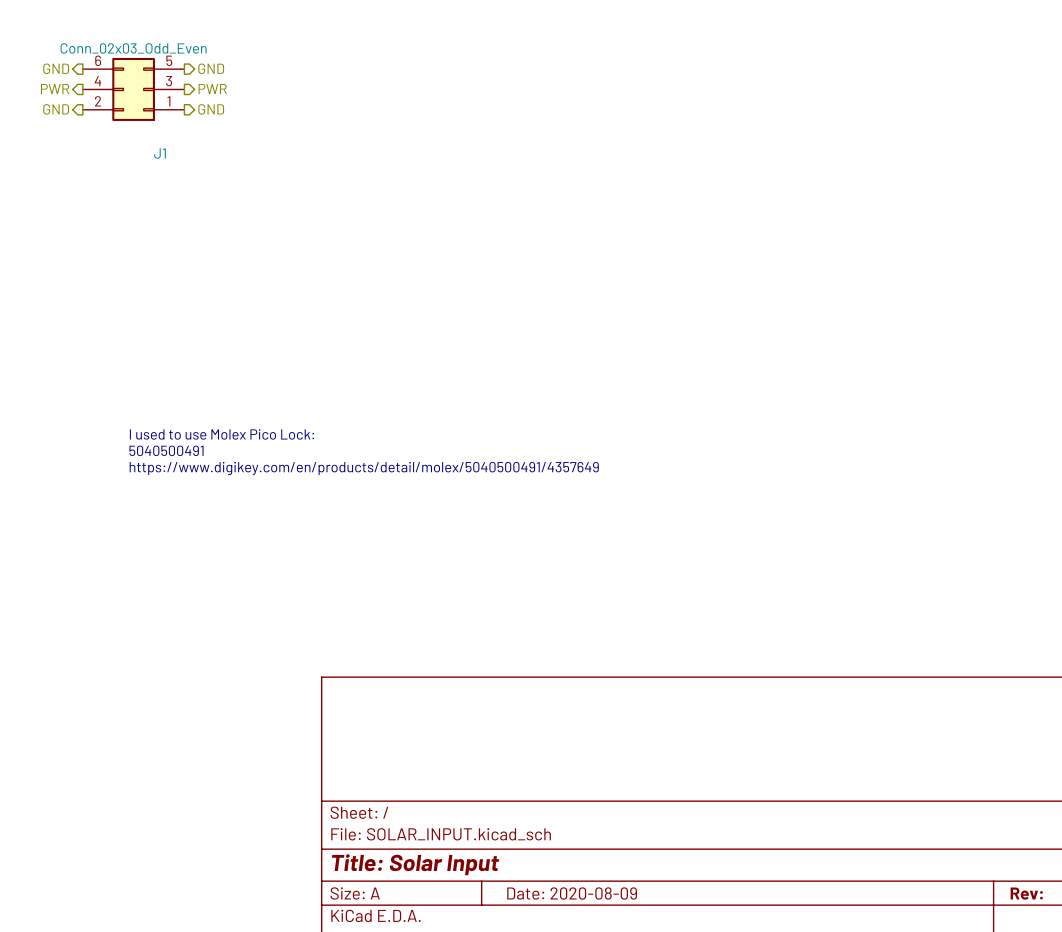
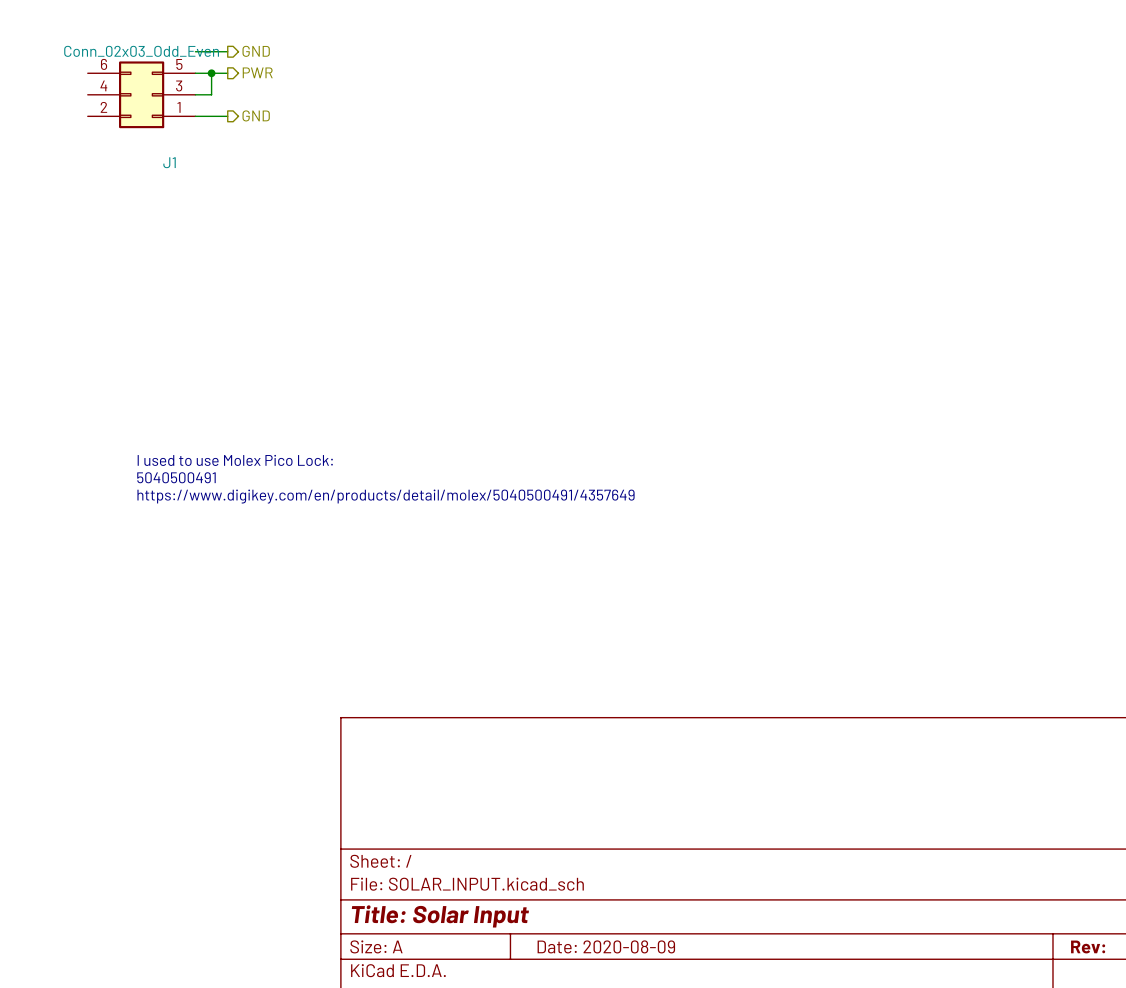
wire: none -> (195, 51) (227, 51)
hierarchical label: GND (56, 68) -> none
hierarchical label position: GND (211, 68) -> GND (256, 51)
wire: none -> (195, 73) (227, 73)
wire: none -> (211, 73) (211, 94) (195, 94)
junction: none -> (211, 73)
hierarchical label: PWR (55, 89) -> none
hierarchical label position: PWR (212, 89) -> PWR (257, 72)
hierarchical label: GND (56, 109) -> none
wire: none -> (195, 116) (227, 116)
hierarchical label position: GND (211, 109) -> GND (256, 115)

